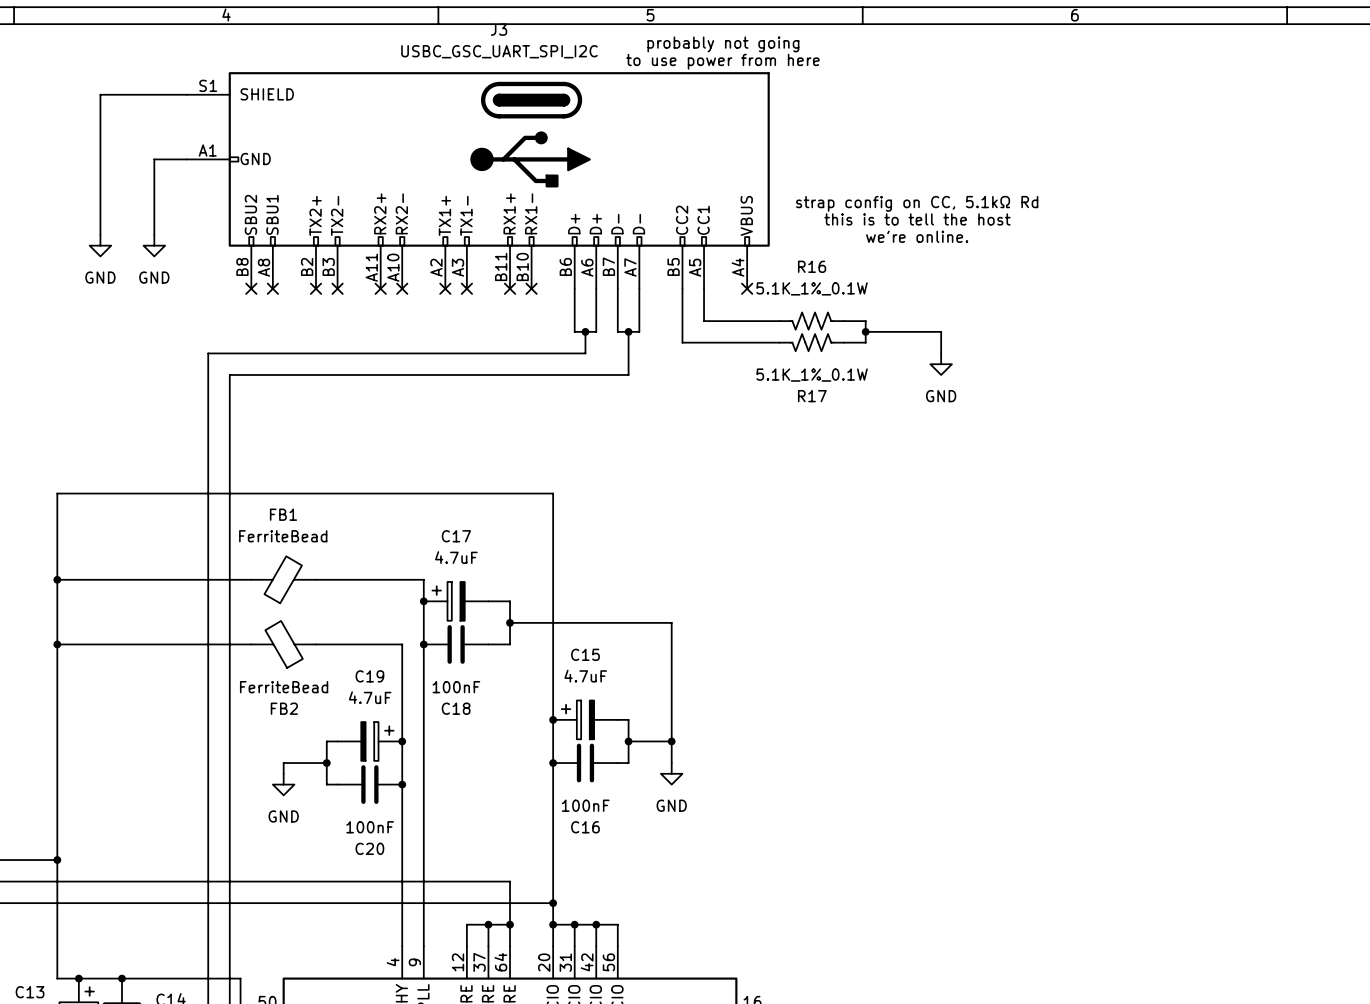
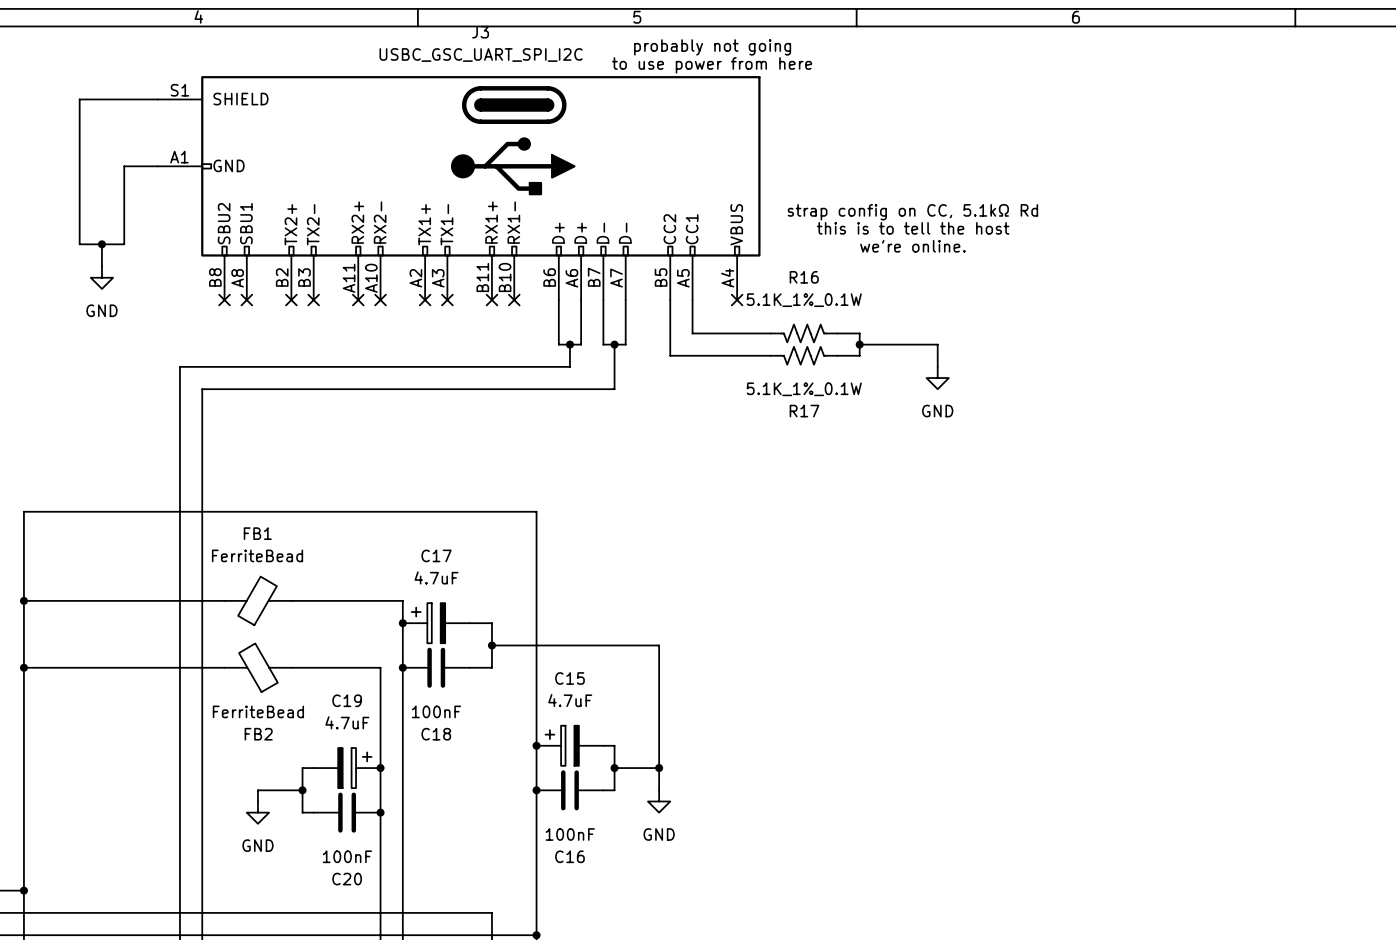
wire: (111, 94) (100, 94) (100, 234) -> (79, 99) (79, 244) (124, 244)
wire: none -> (101, 244) (101, 266)
junction: none -> (101, 244)
power symbol: GND (100, 245) -> none
power symbol: GND (154, 245) -> none
power symbol: none -> GND (101, 277)

